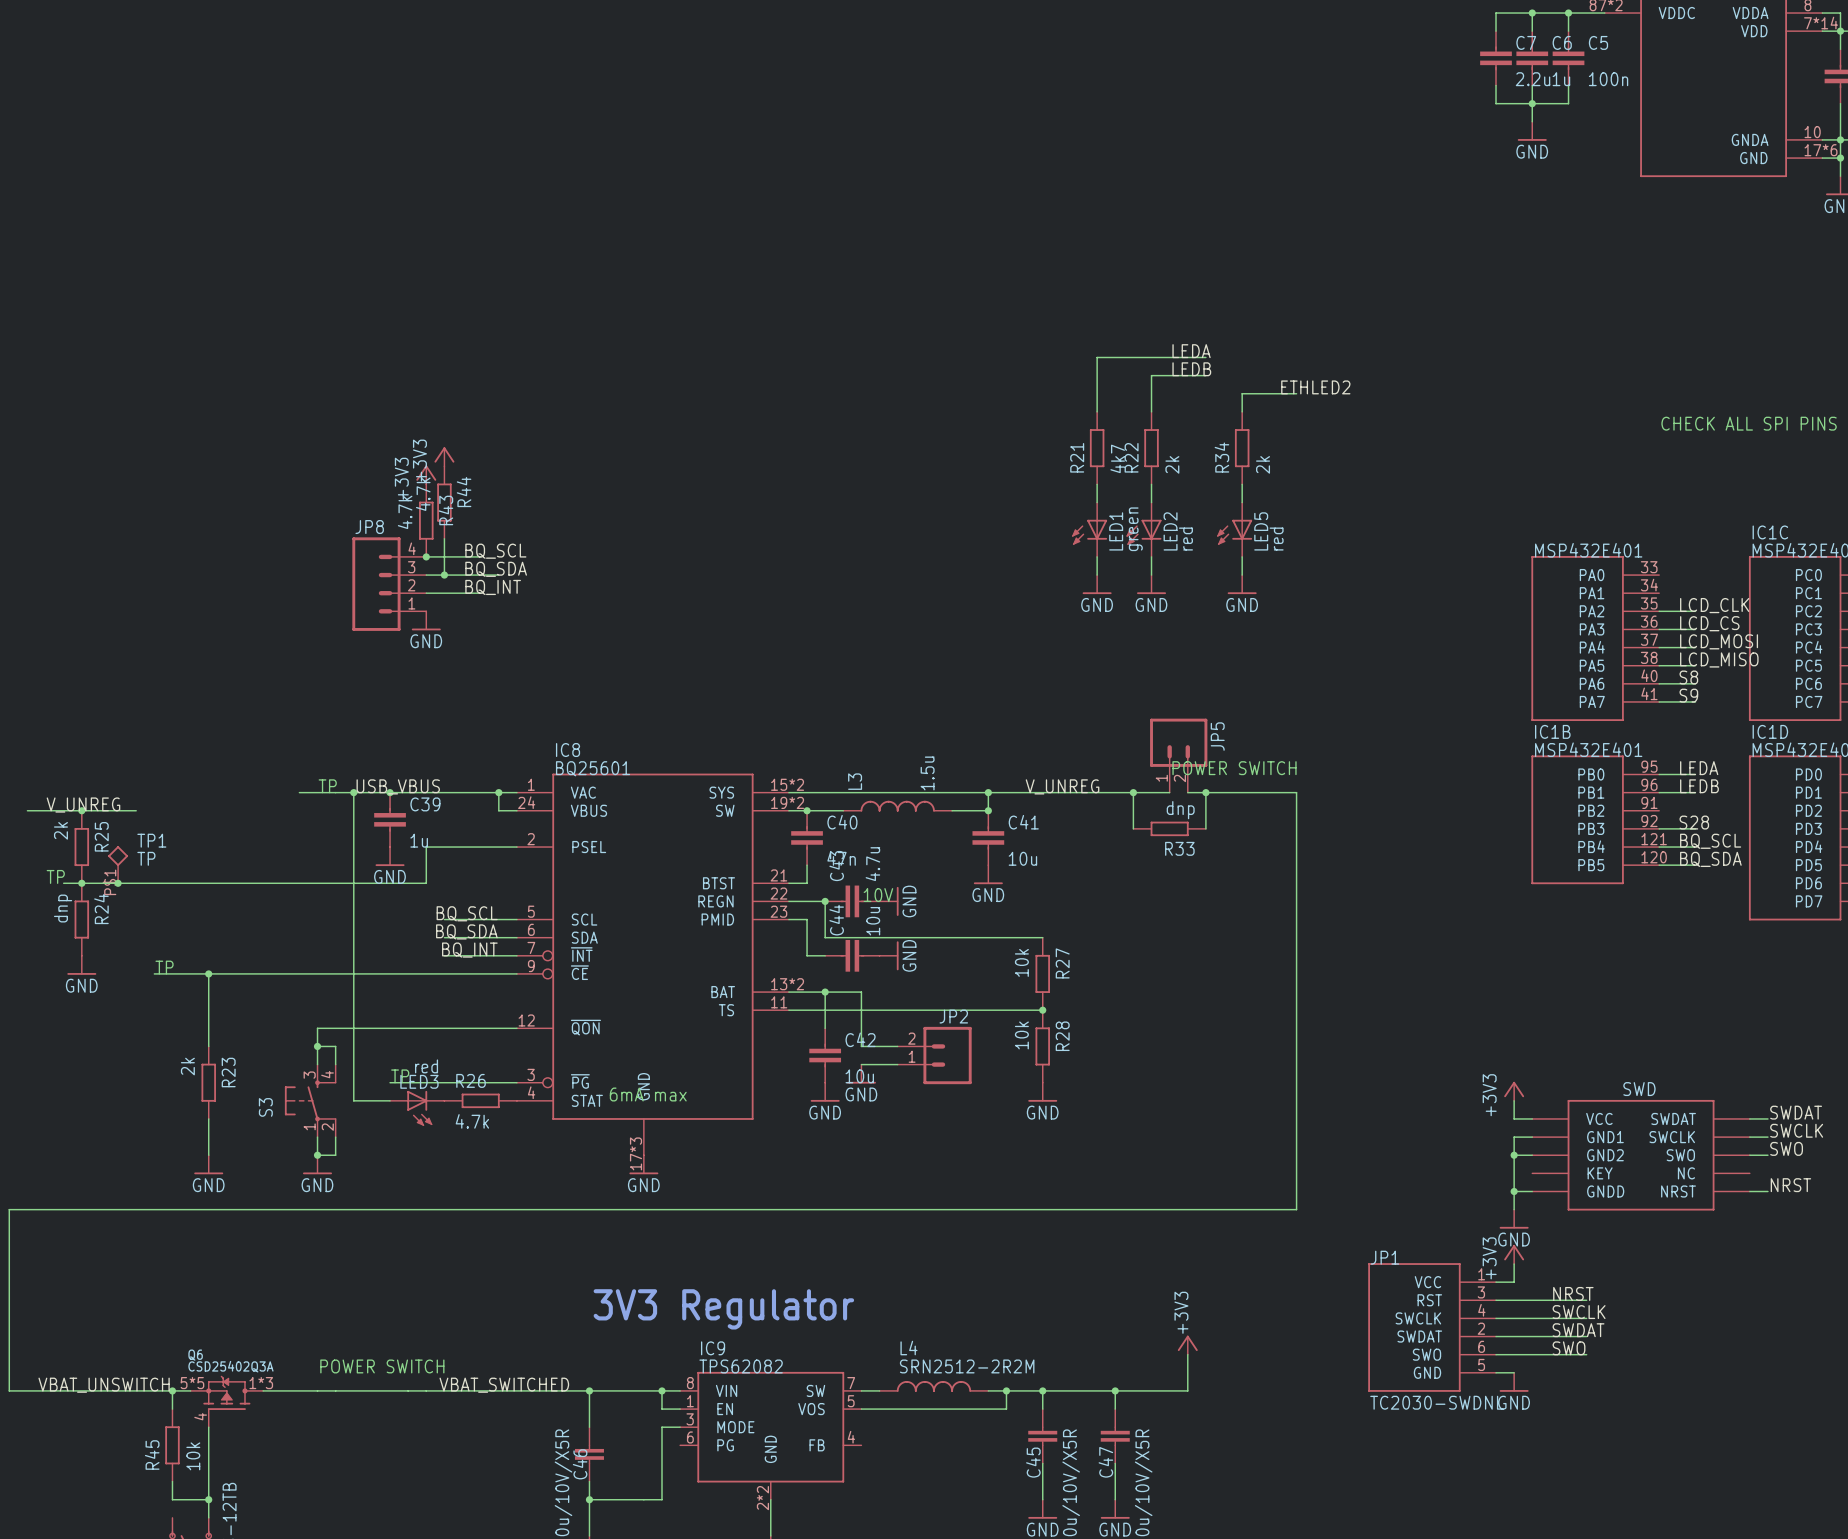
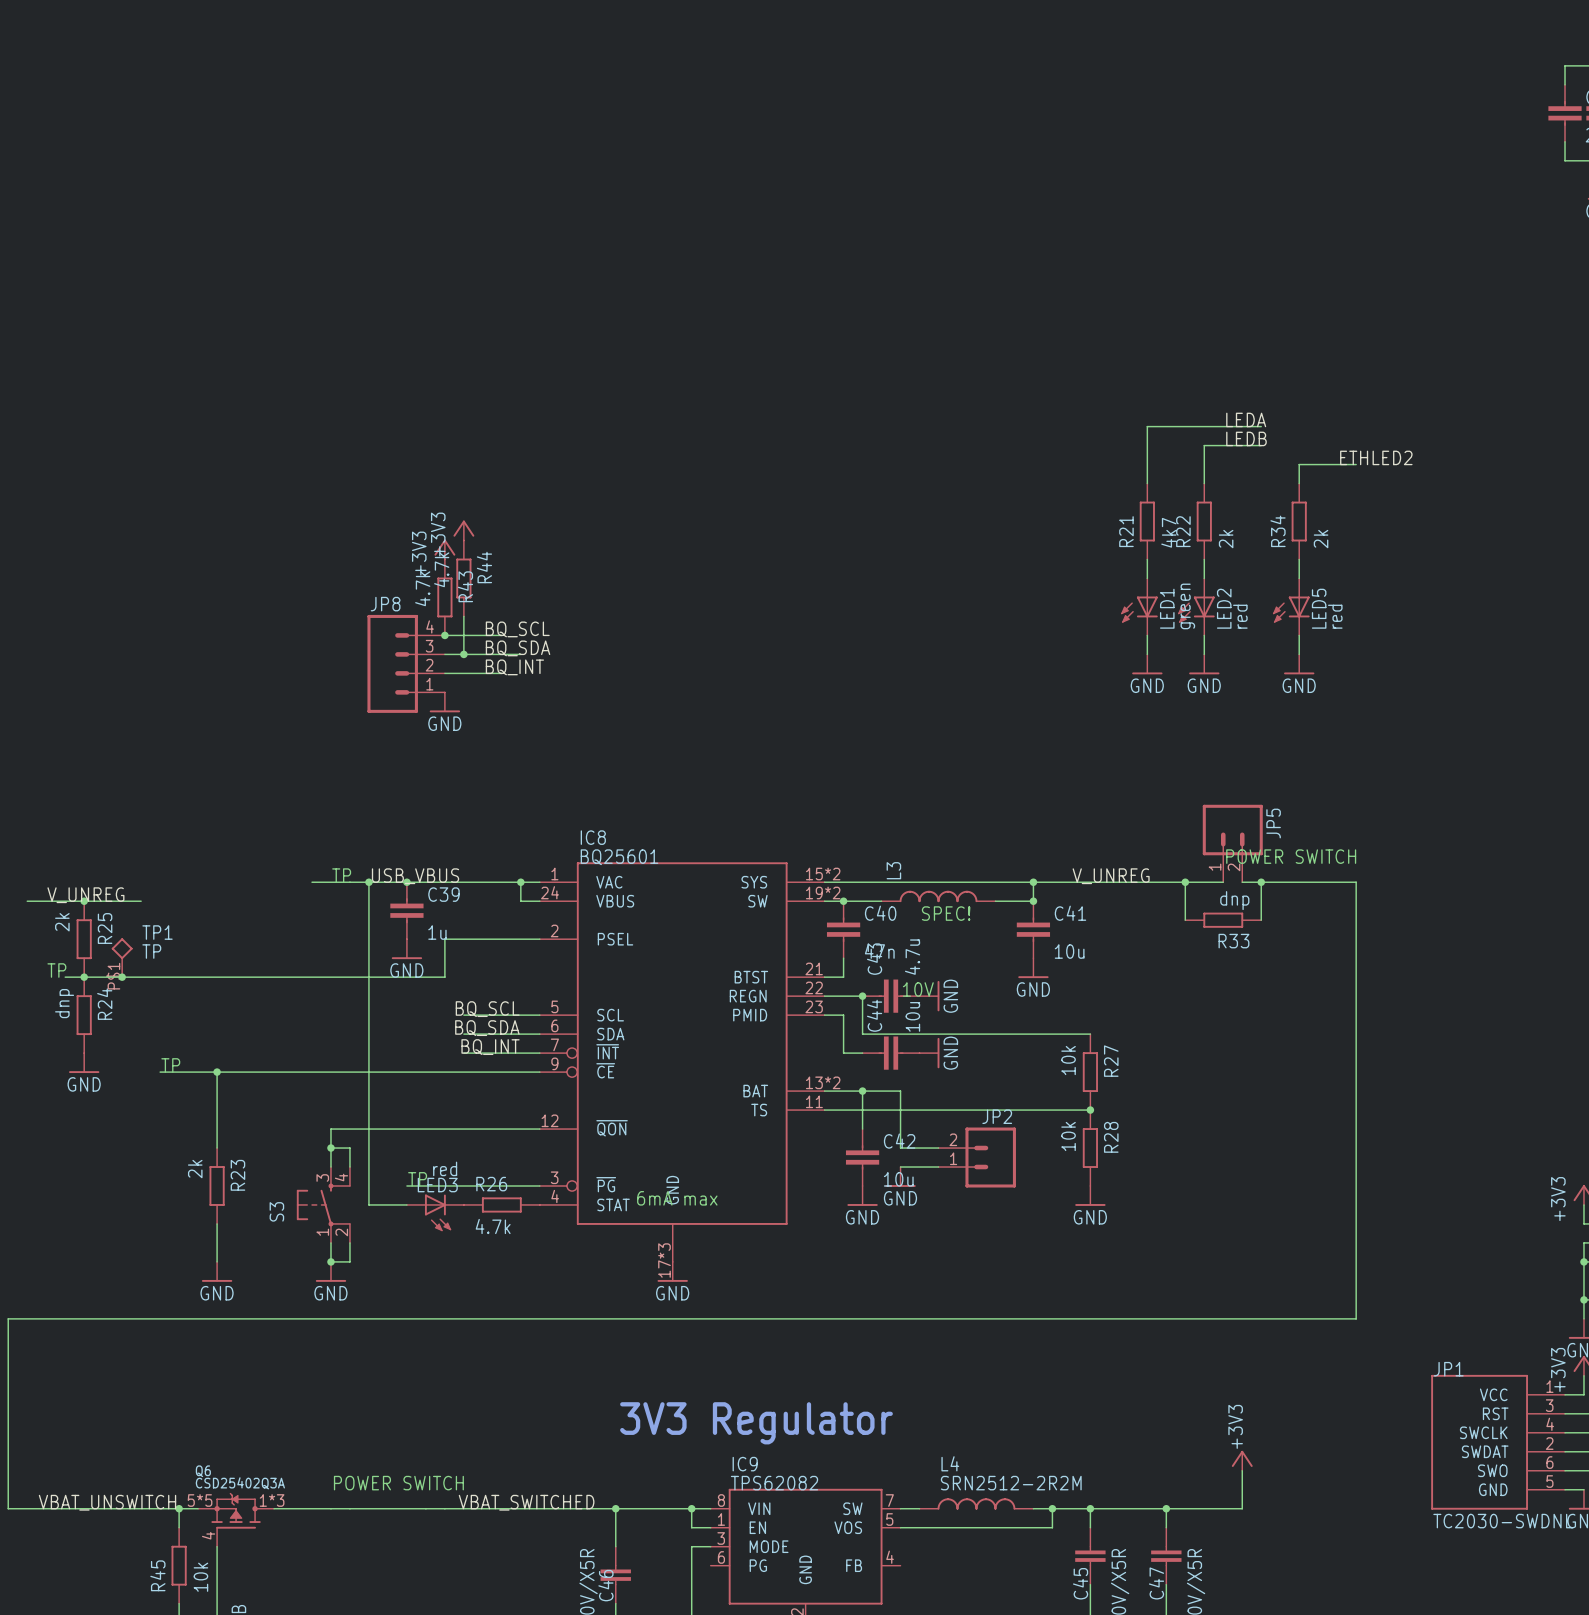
L3 value: 1.5u (927, 773) -> none
text: none -> SPEC! (946, 913)

